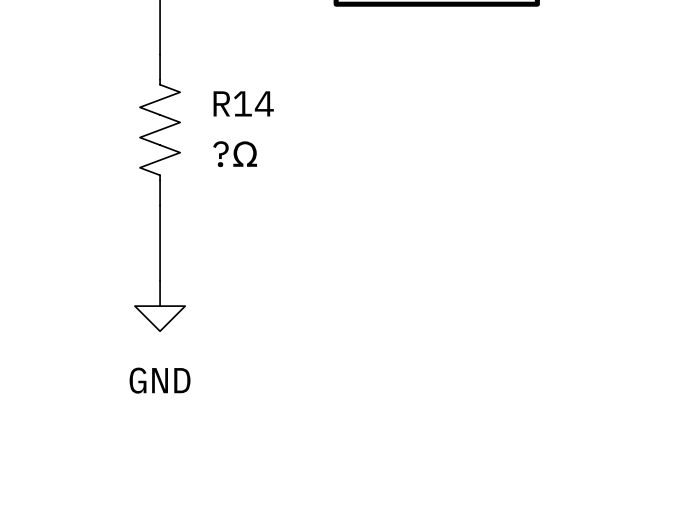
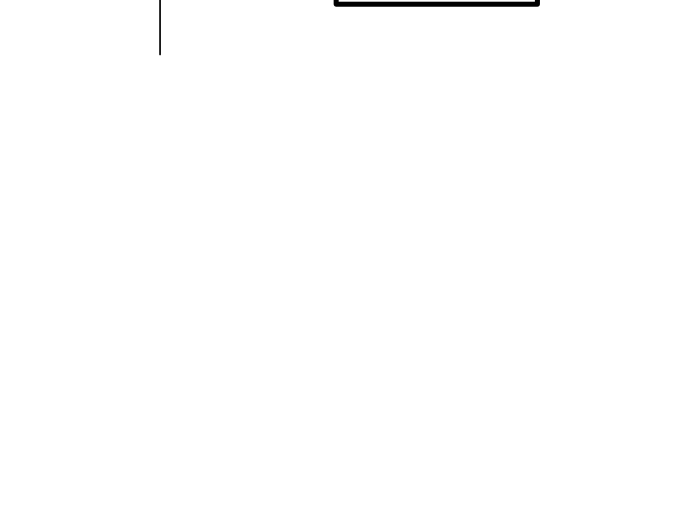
R14: ?Ω (160, 130) -> none
wire: (160, 205) (160, 280) -> none
power symbol: GND (160, 306) -> none

